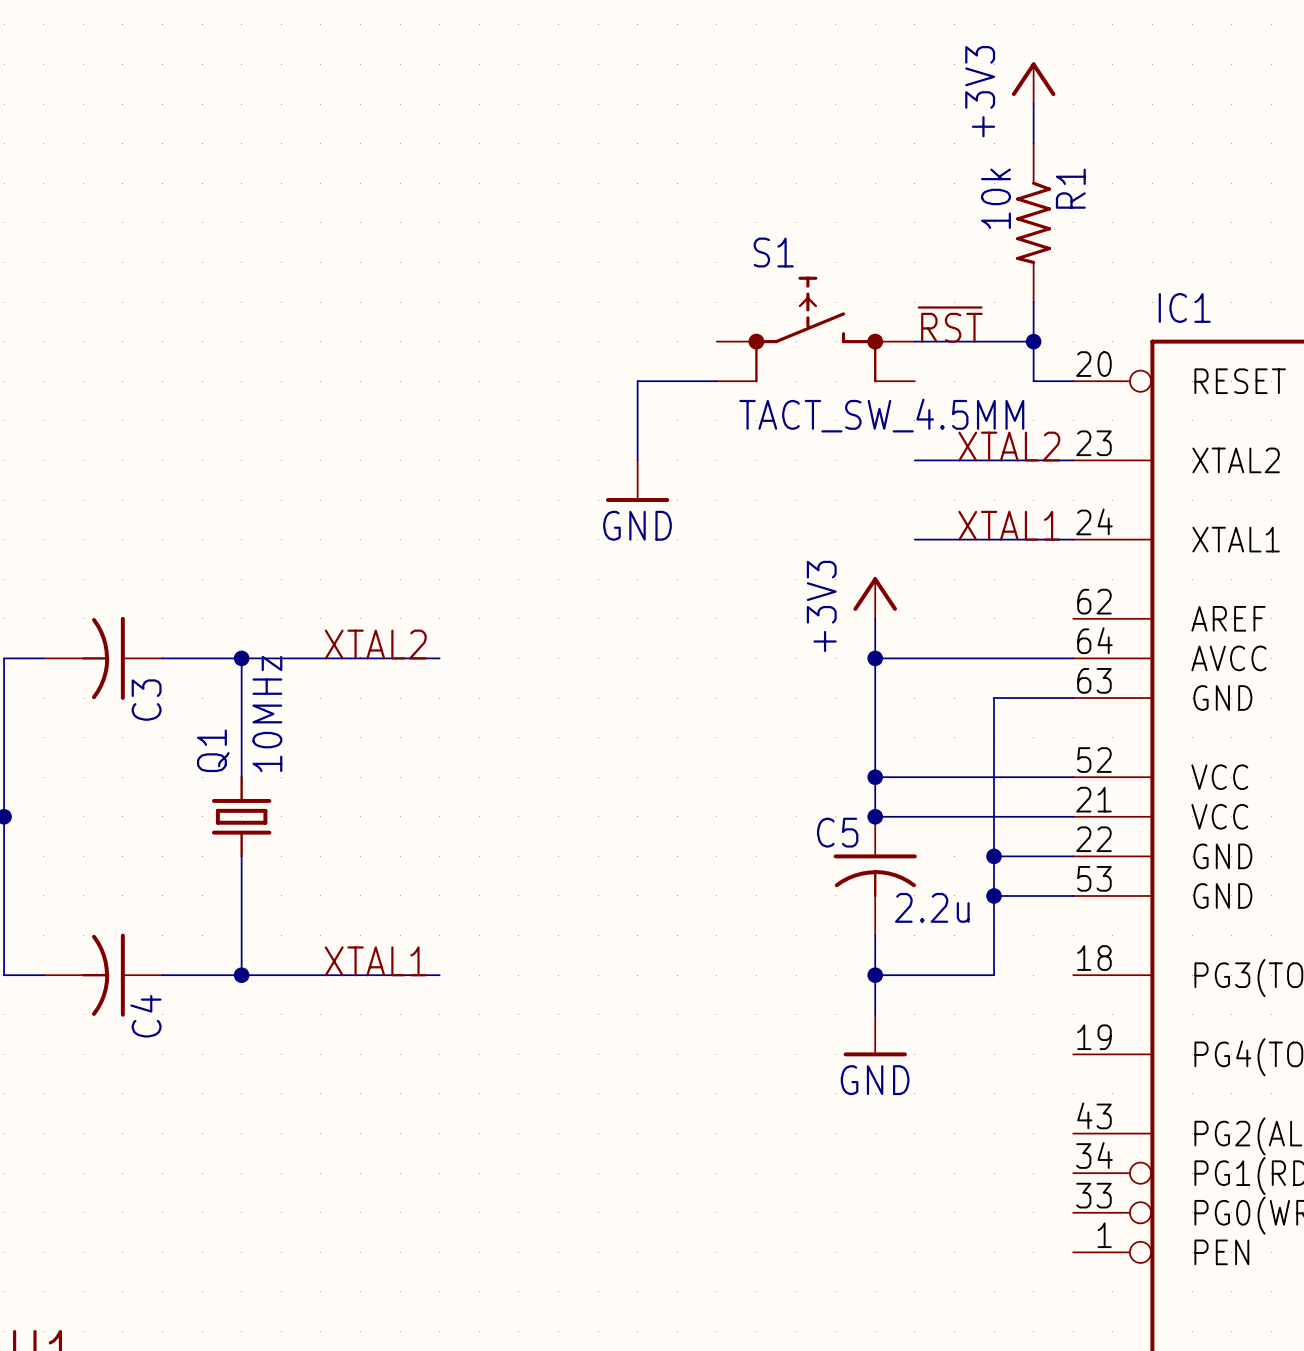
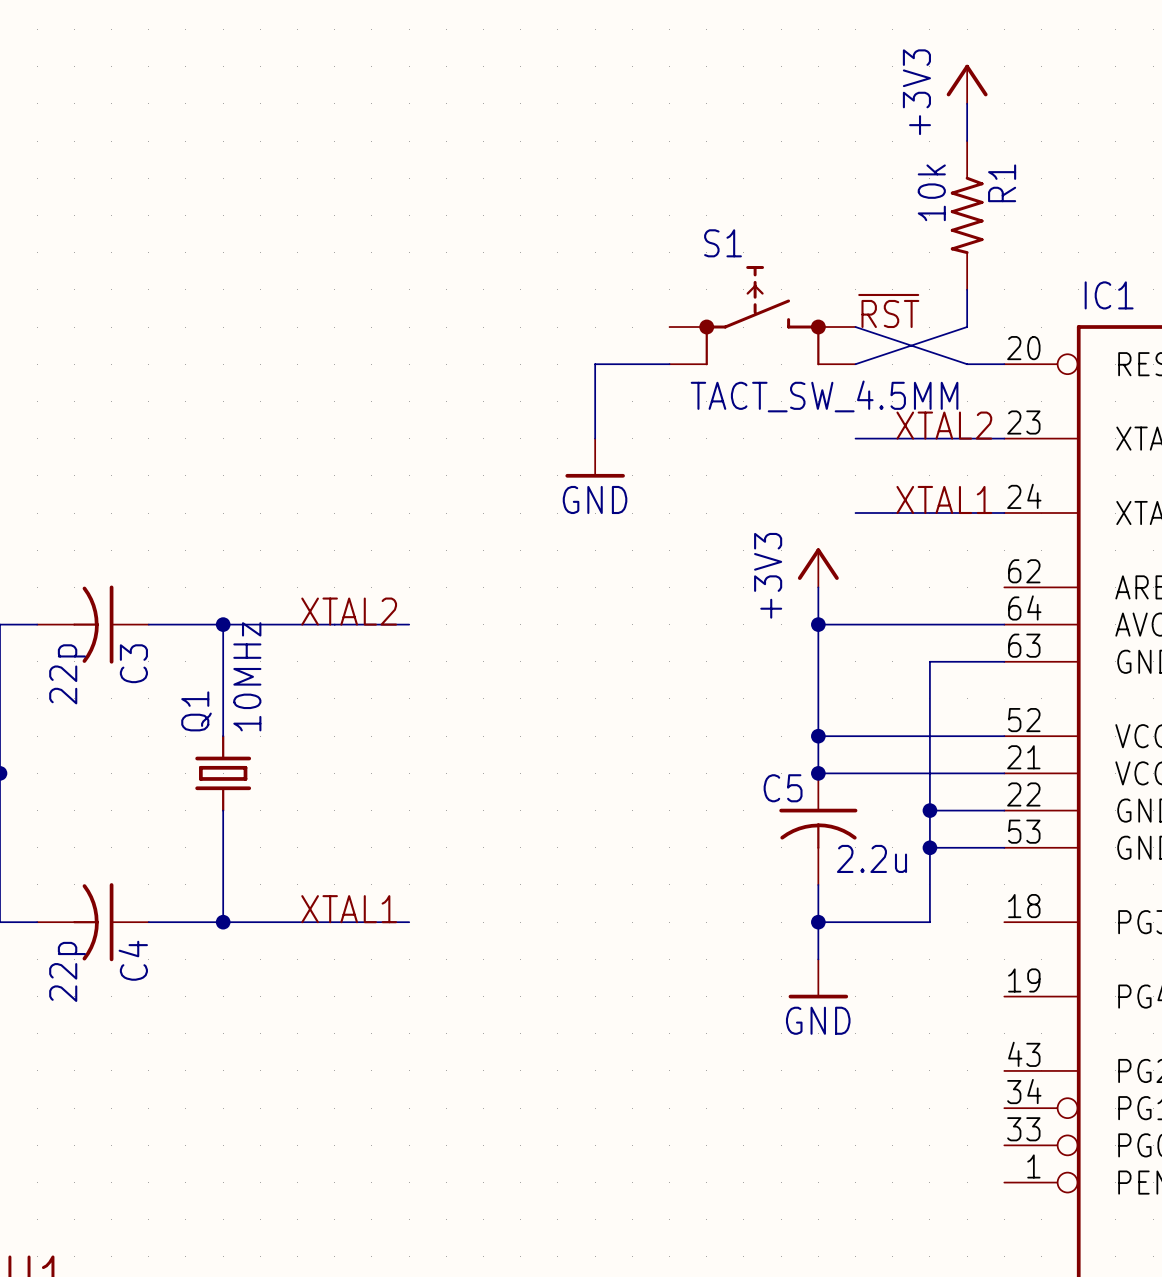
wire: (914, 341) (1033, 341) (1033, 381) -> (855, 327) (967, 364)
wire: none -> (967, 327) (855, 364)
junction: (1033, 341) -> none
C3 value: none -> 22p (67, 674)
C4 value: none -> 22p (67, 971)

